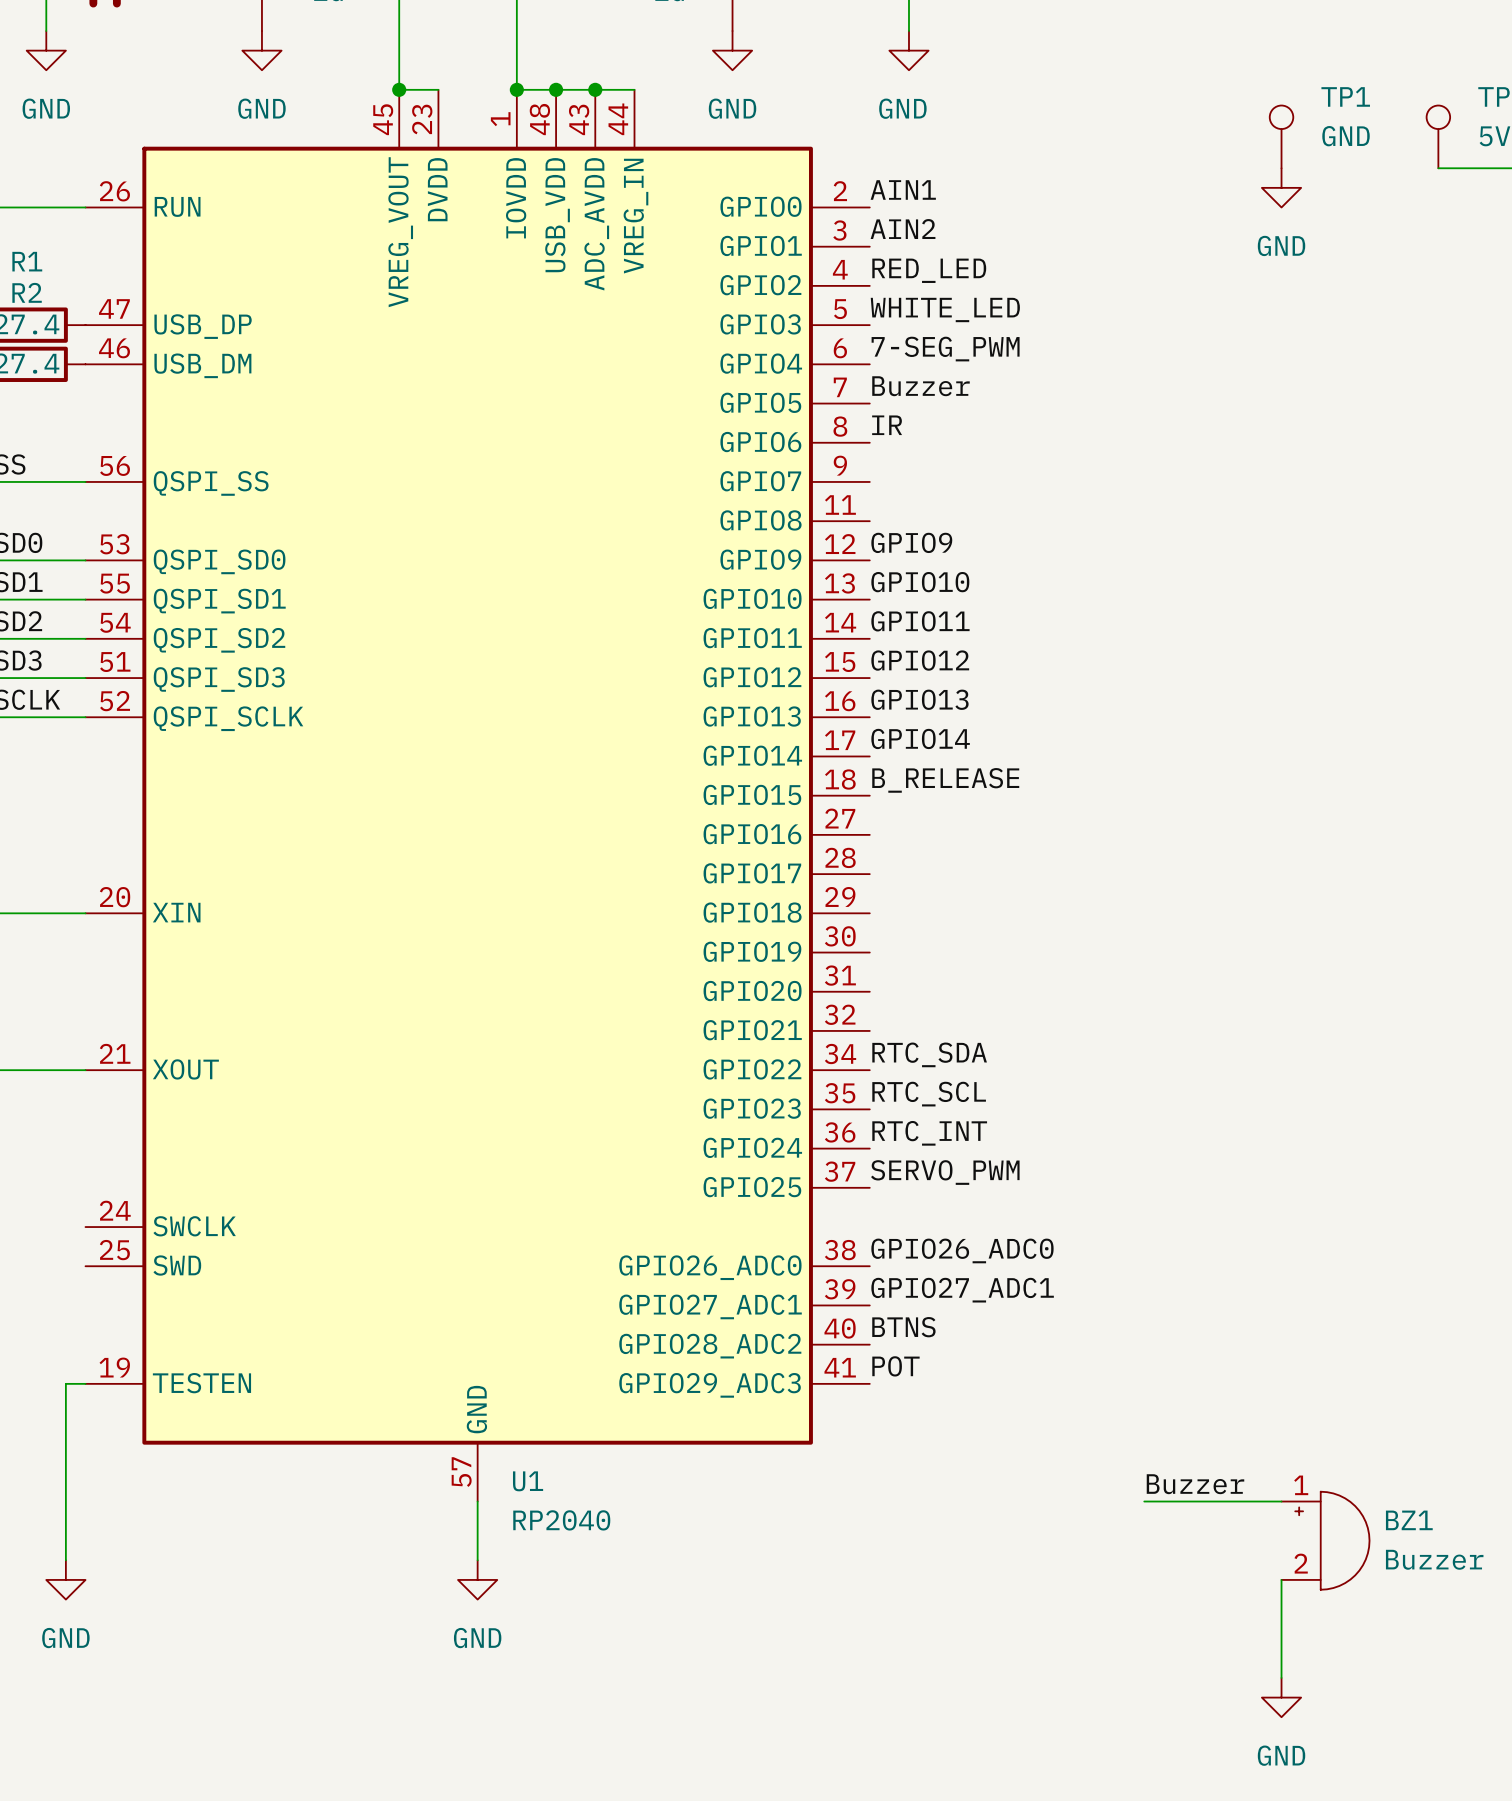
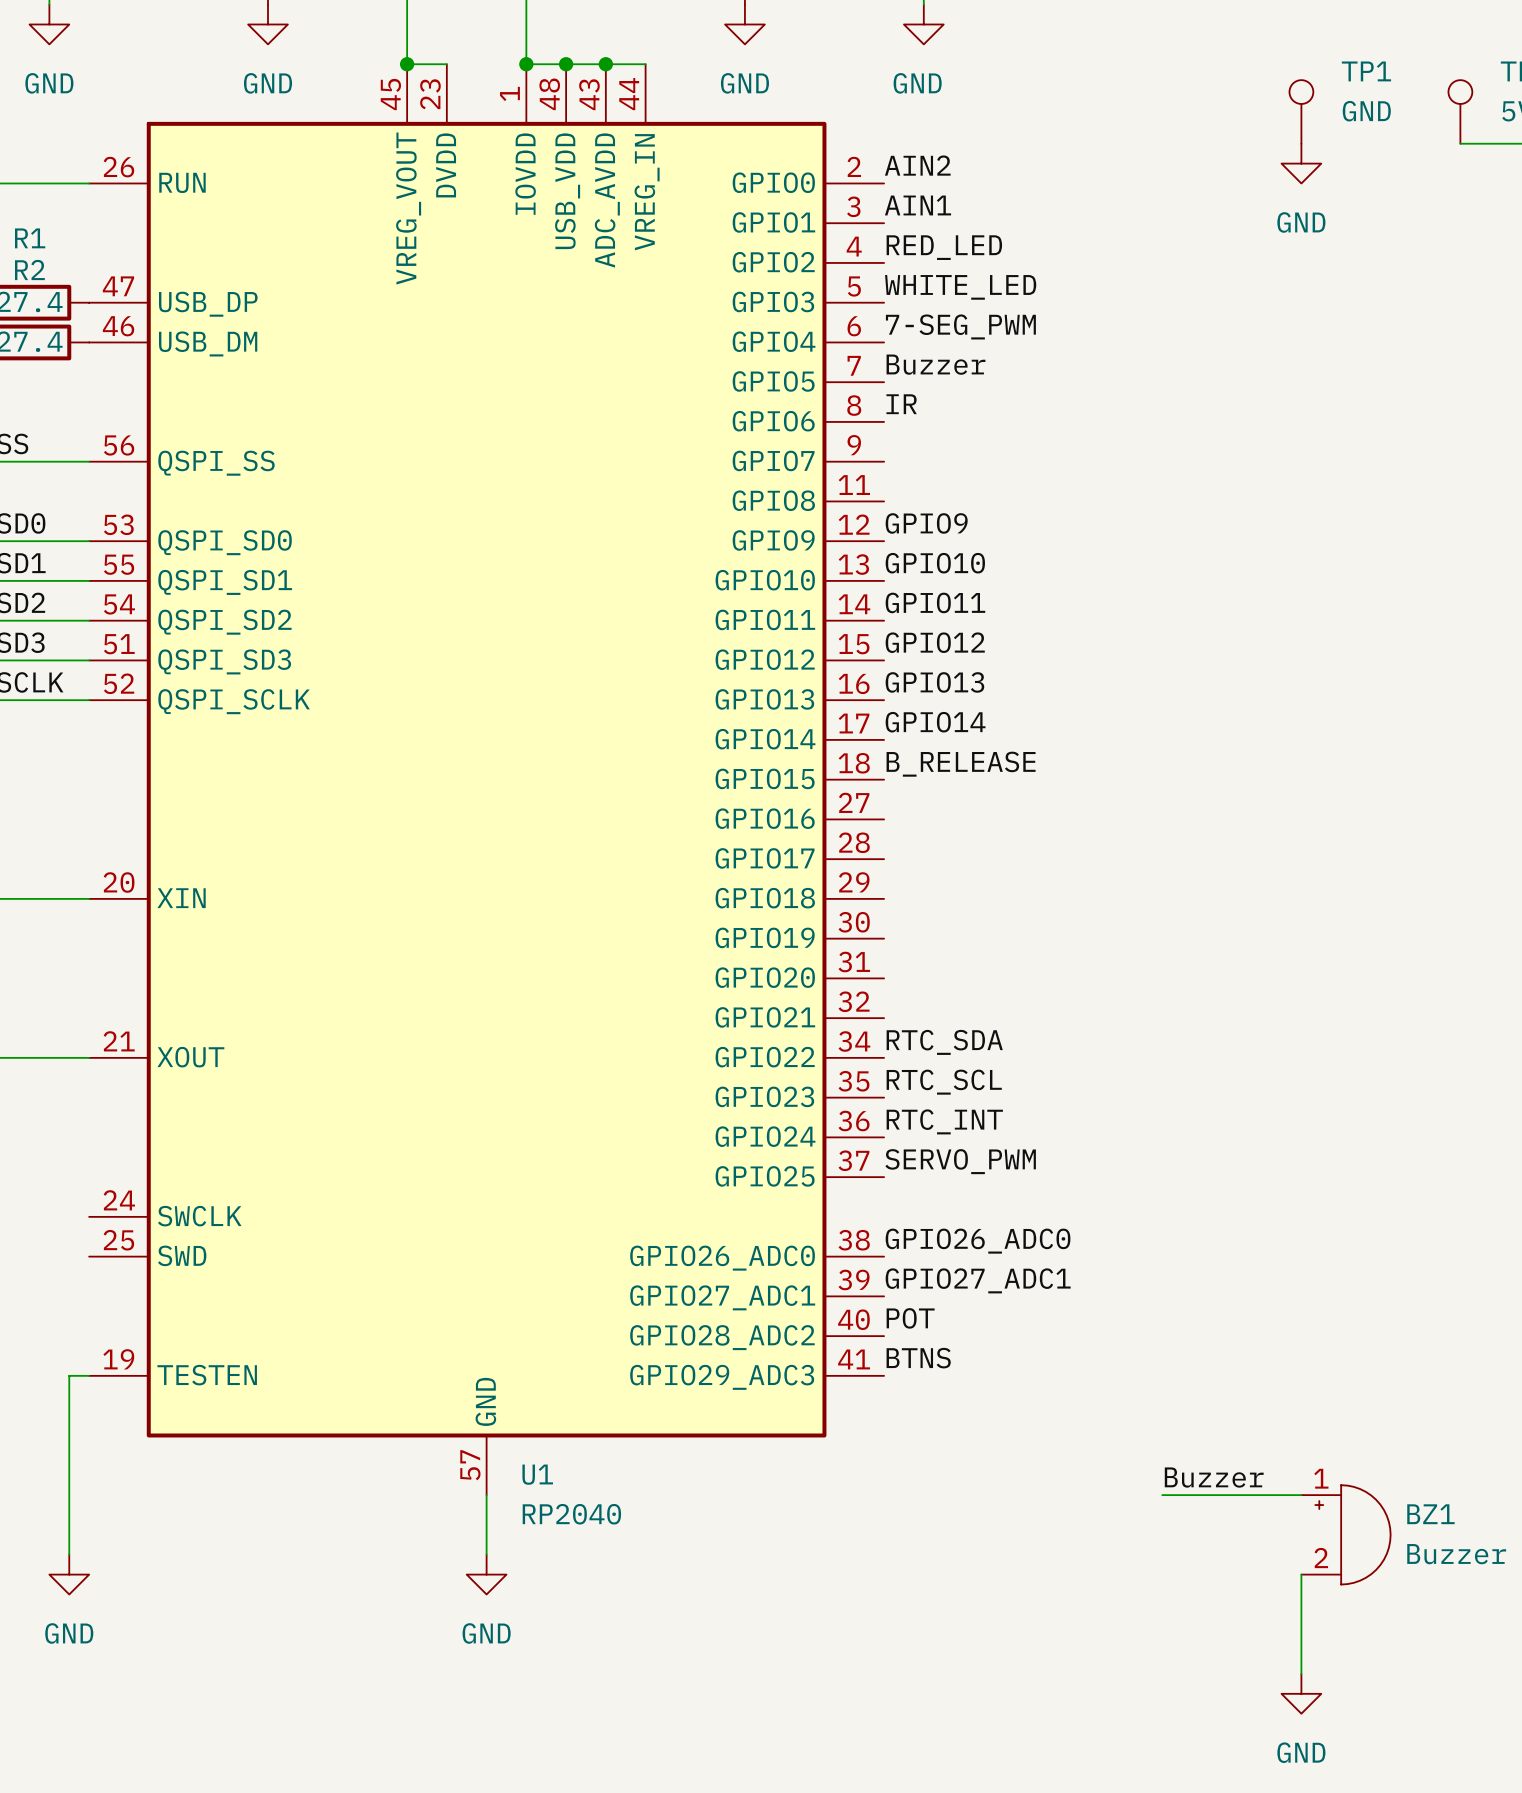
label: AIN1 (903, 189) -> AIN2 (917, 165)
label: AIN2 (903, 229) -> AIN1 (918, 205)
label: BTNS (903, 1327) -> POT (910, 1318)
label: POT (895, 1366) -> BTNS (918, 1358)

